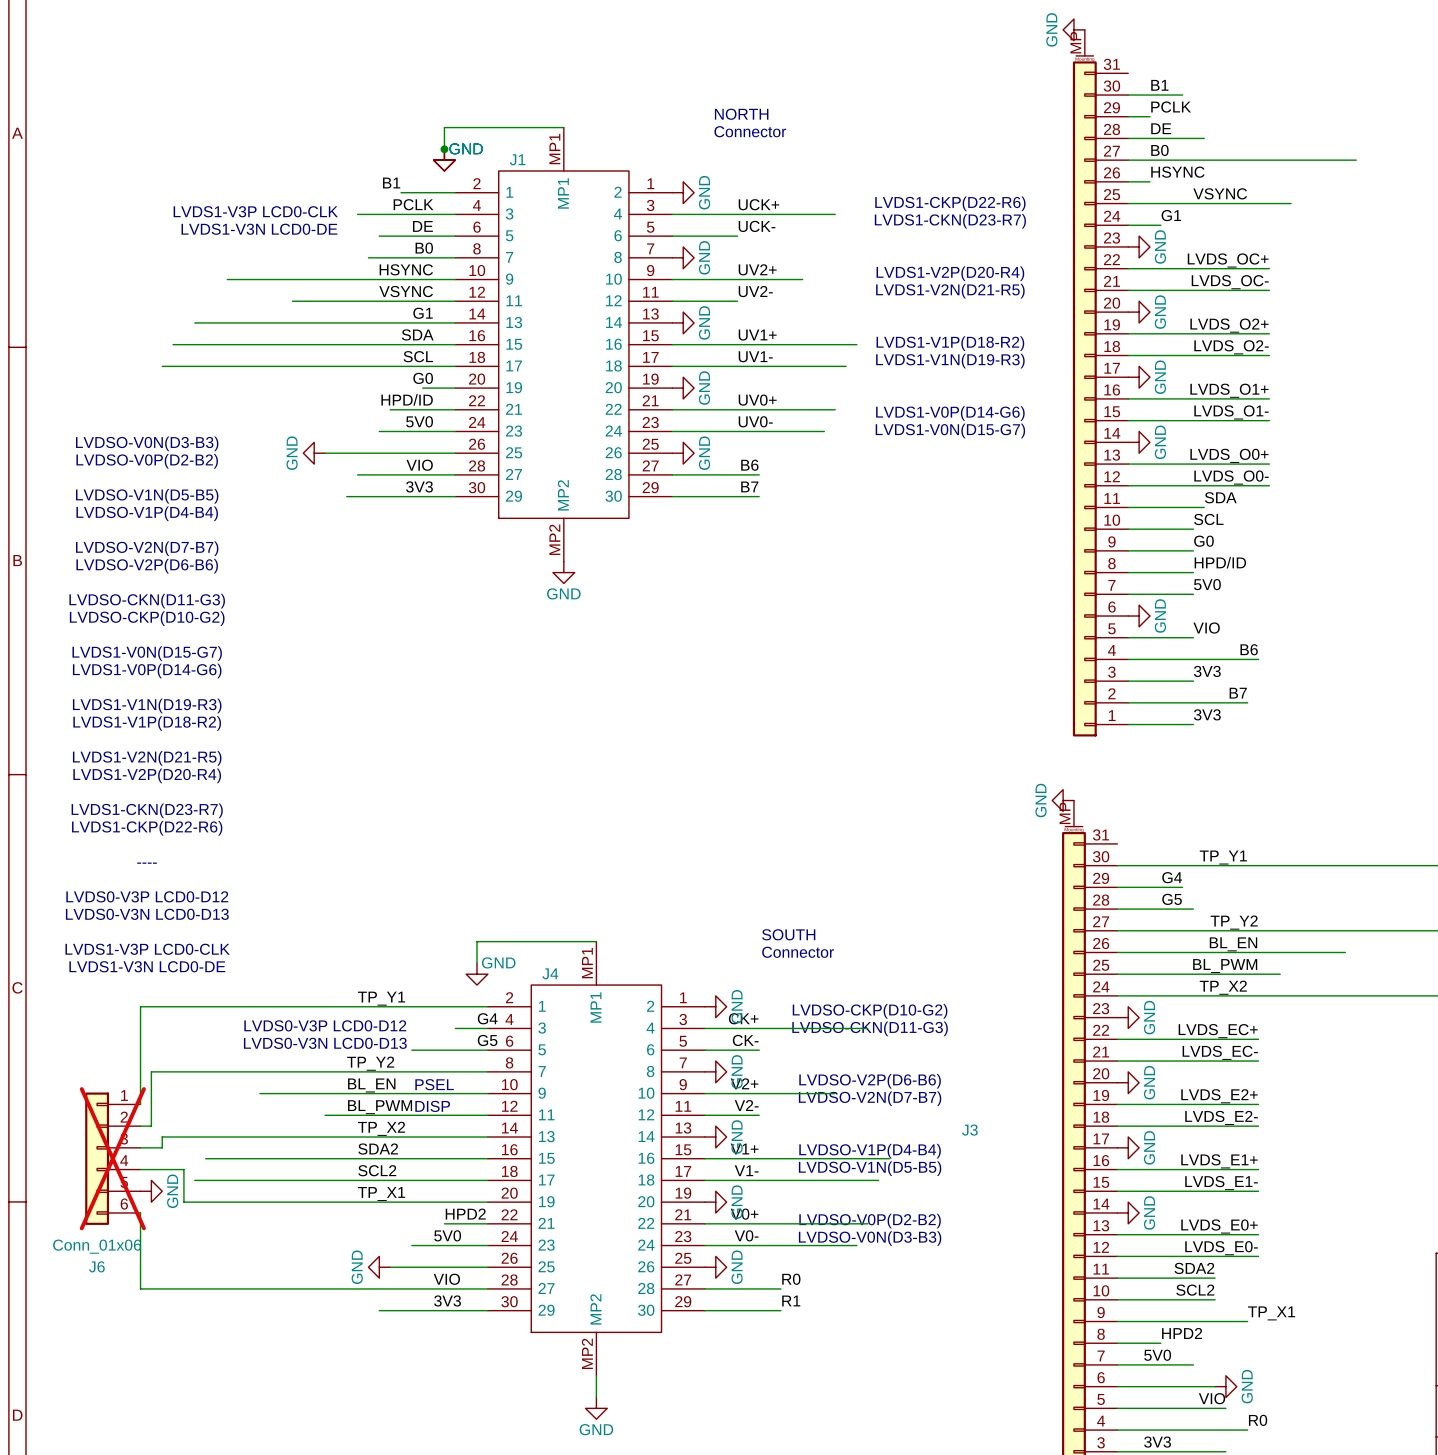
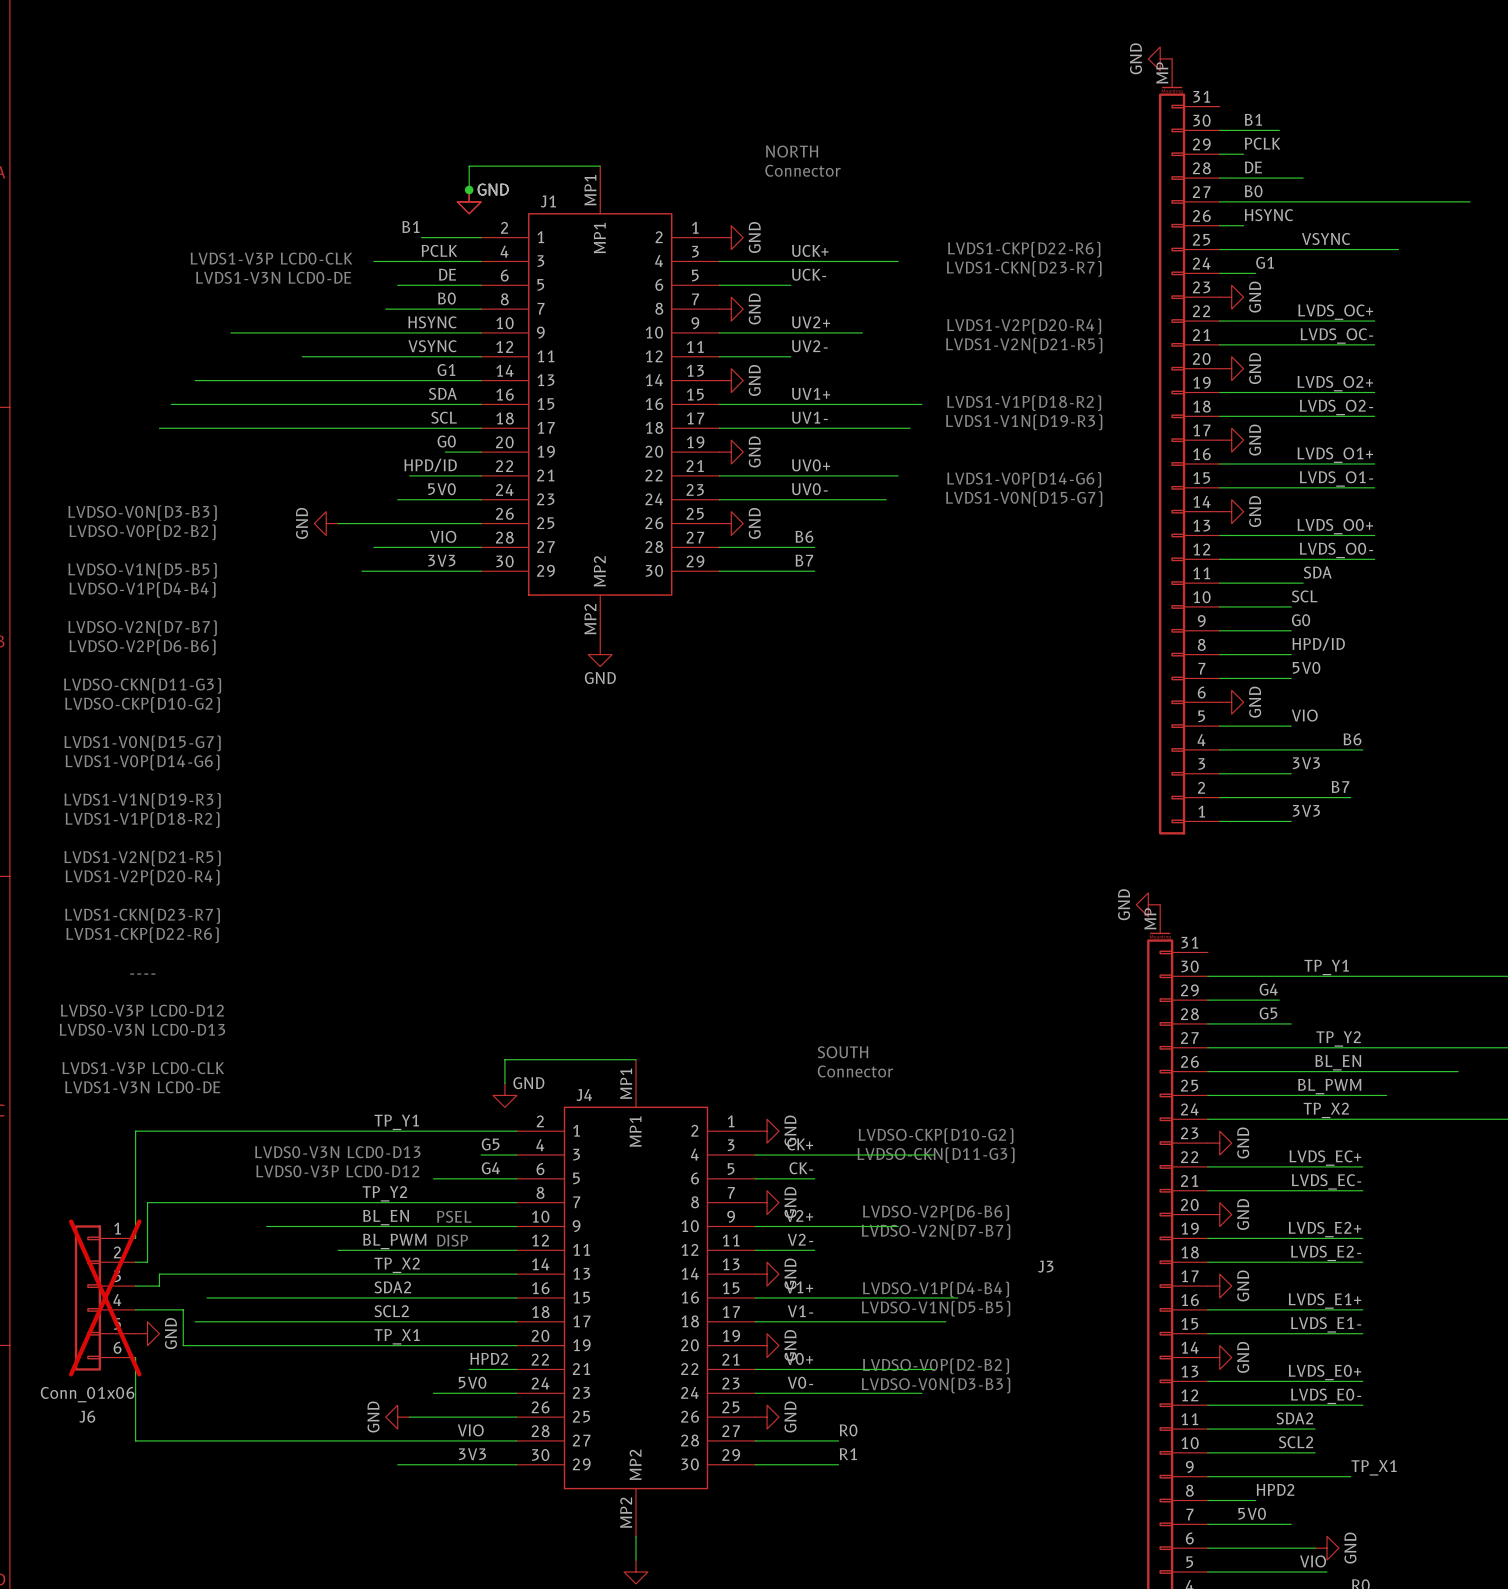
label position: G4 (487, 1018) -> G4 (490, 1168)
text: LVDS0-V3P LCD0-D12 (325, 1025) -> LVDS0-V3N LCD0-D13 (337, 1152)
label position: G5 (487, 1040) -> G5 (490, 1144)
text: LVDS0-V3N LCD0-D13 (325, 1043) -> LVDS0-V3P LCD0-D12 (337, 1171)

